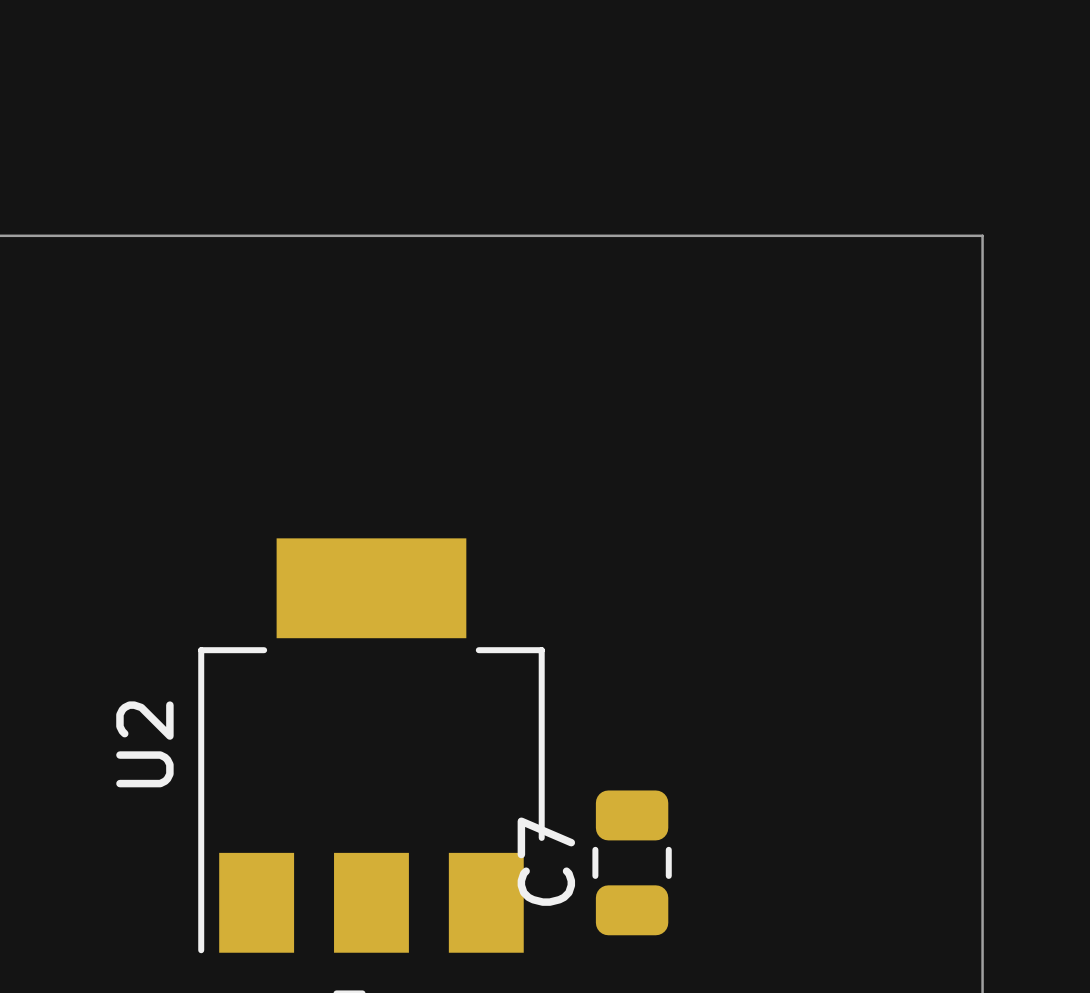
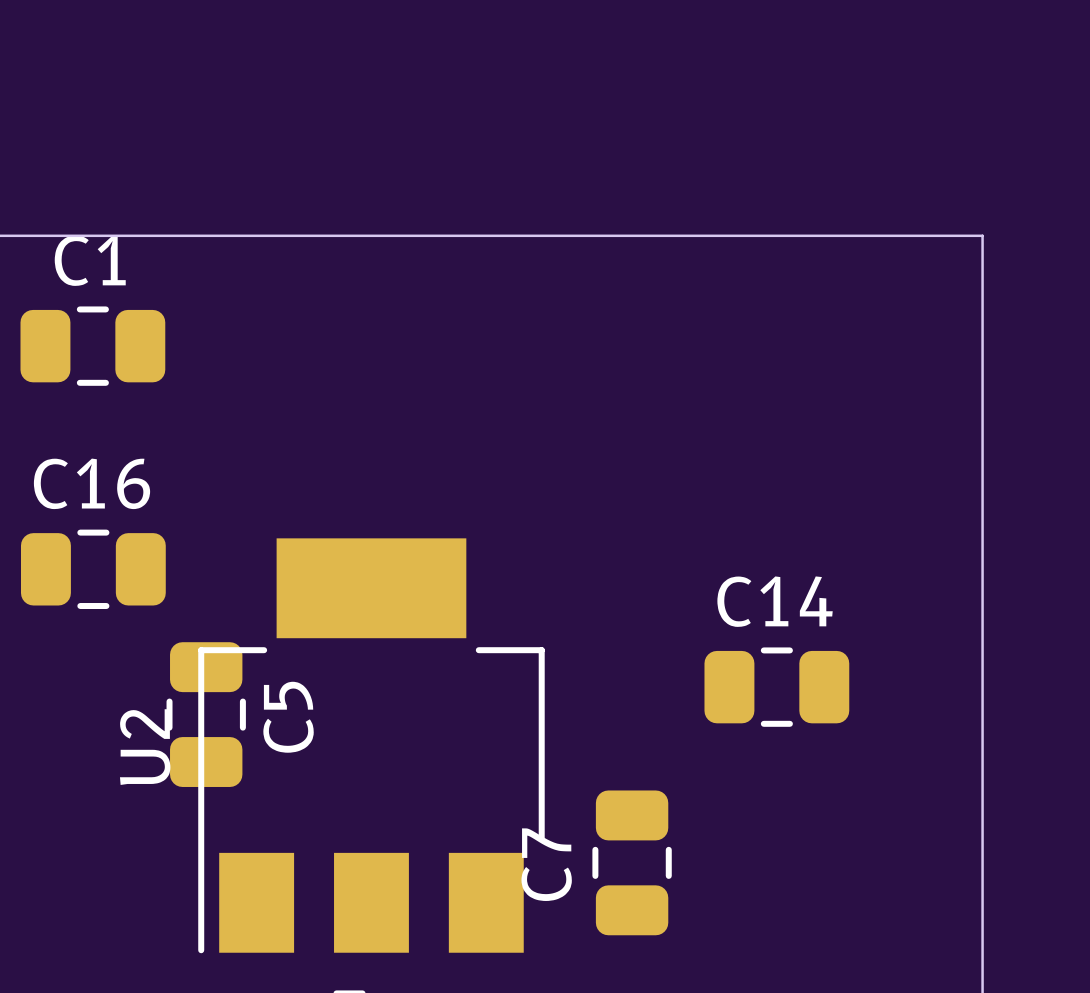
C1: none -> (92, 346)
C16: none -> (93, 569)
C14: none -> (776, 687)
C5: none -> (206, 714)

